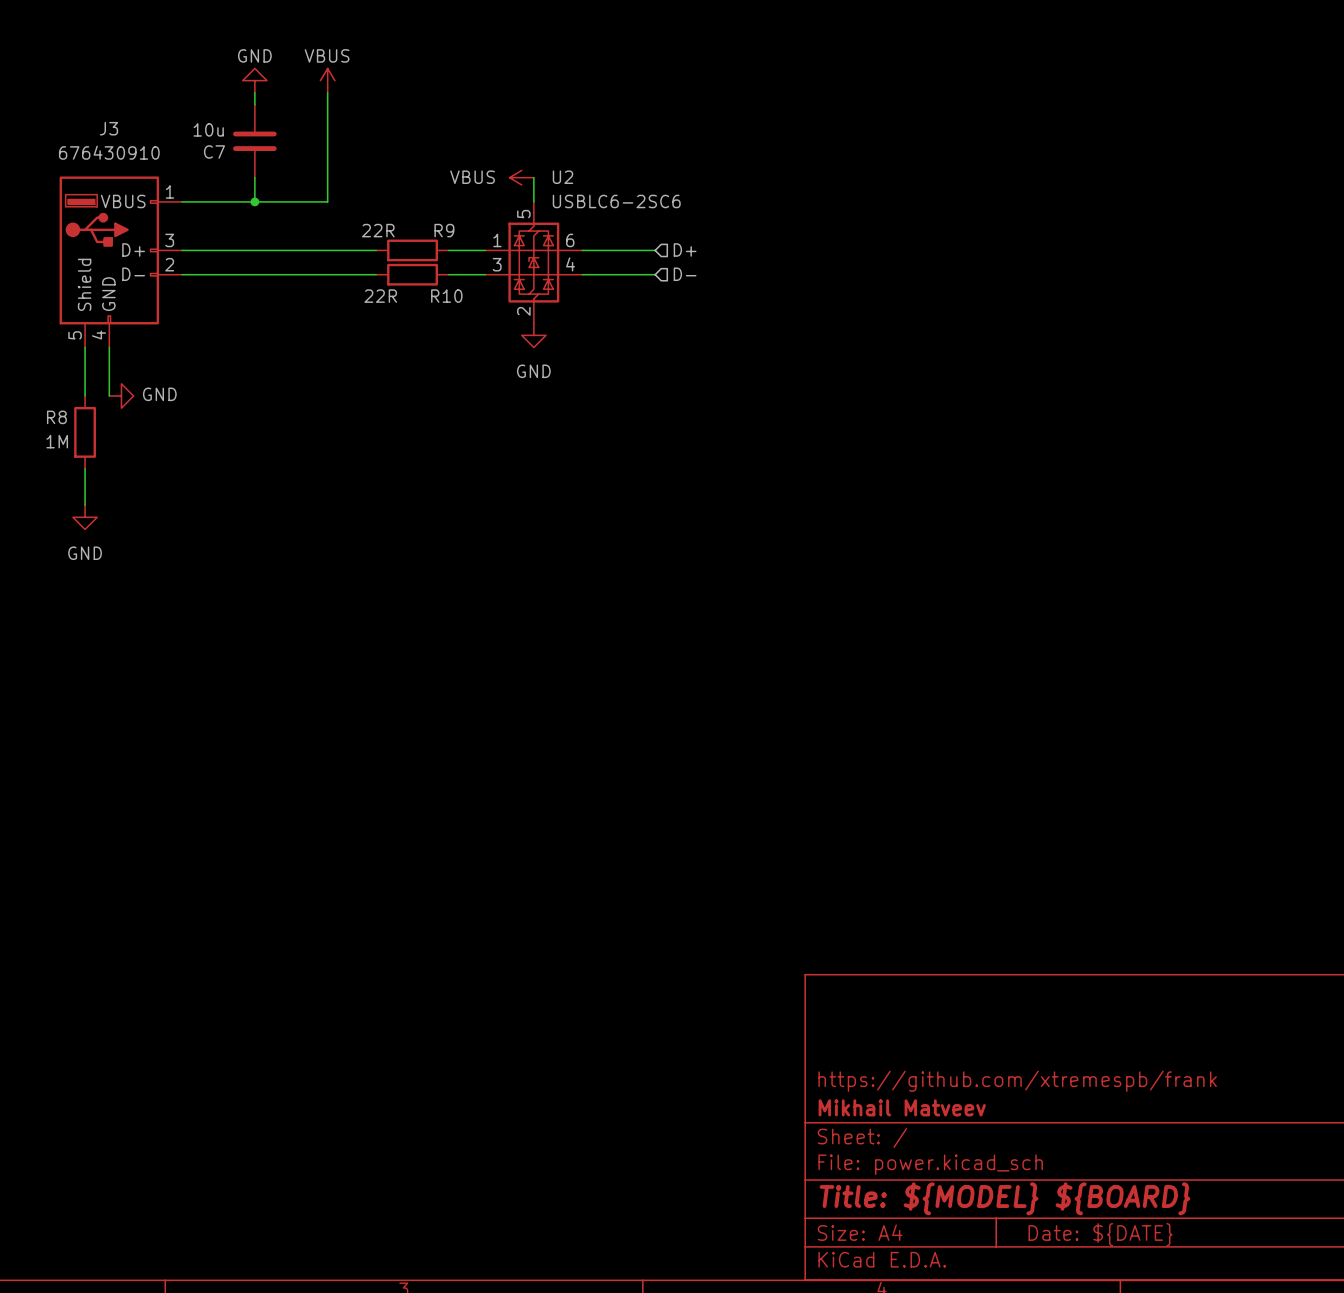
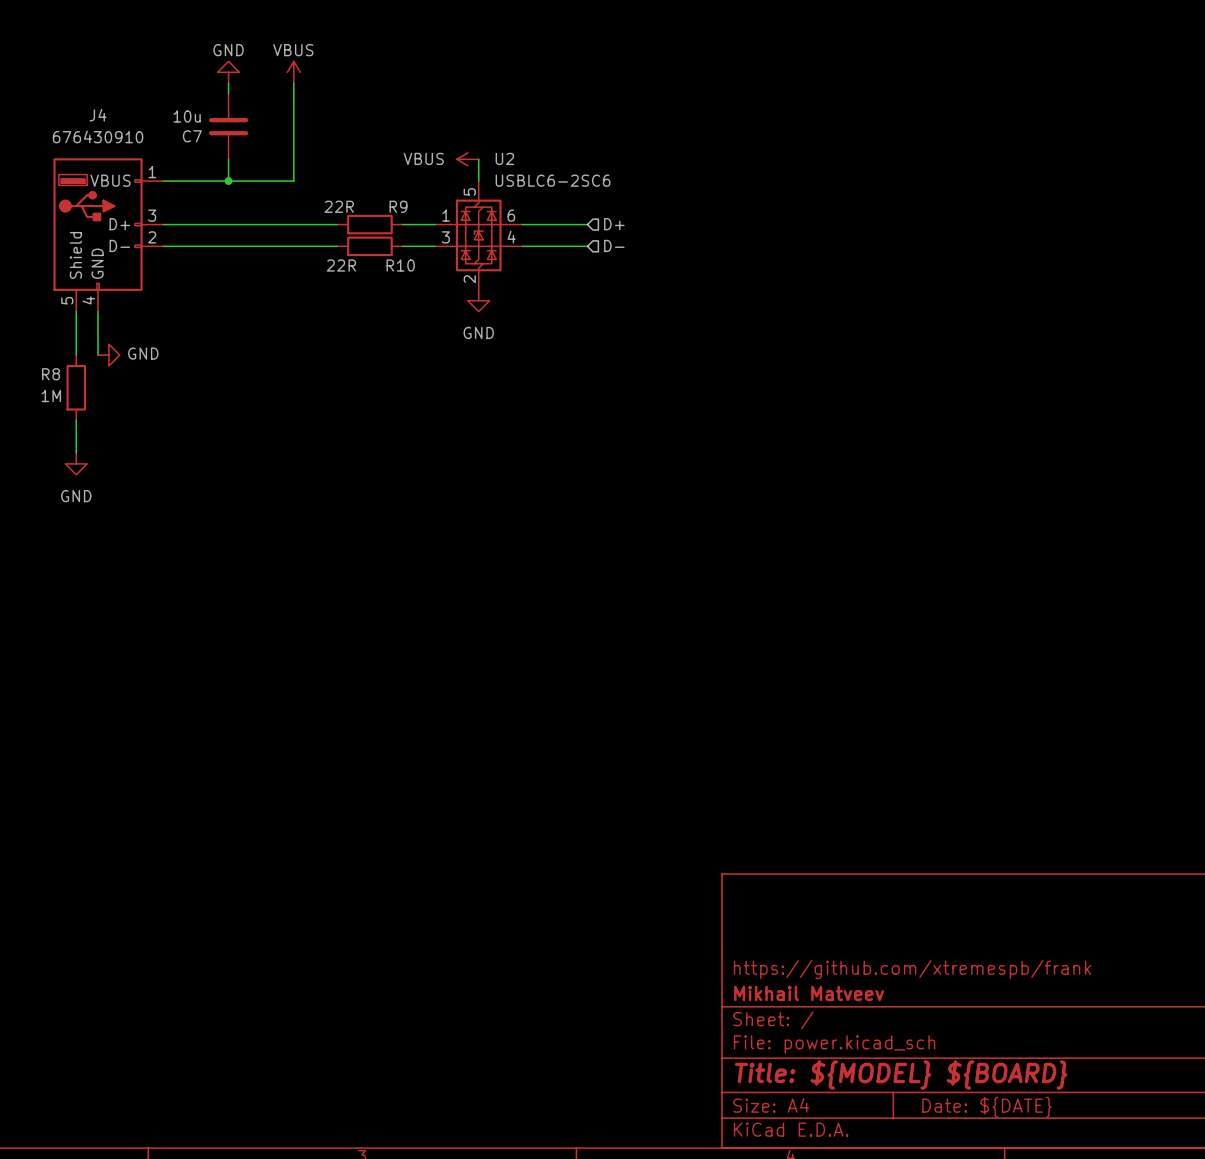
J3 name: J3 (109, 128) -> J4 (98, 115)

